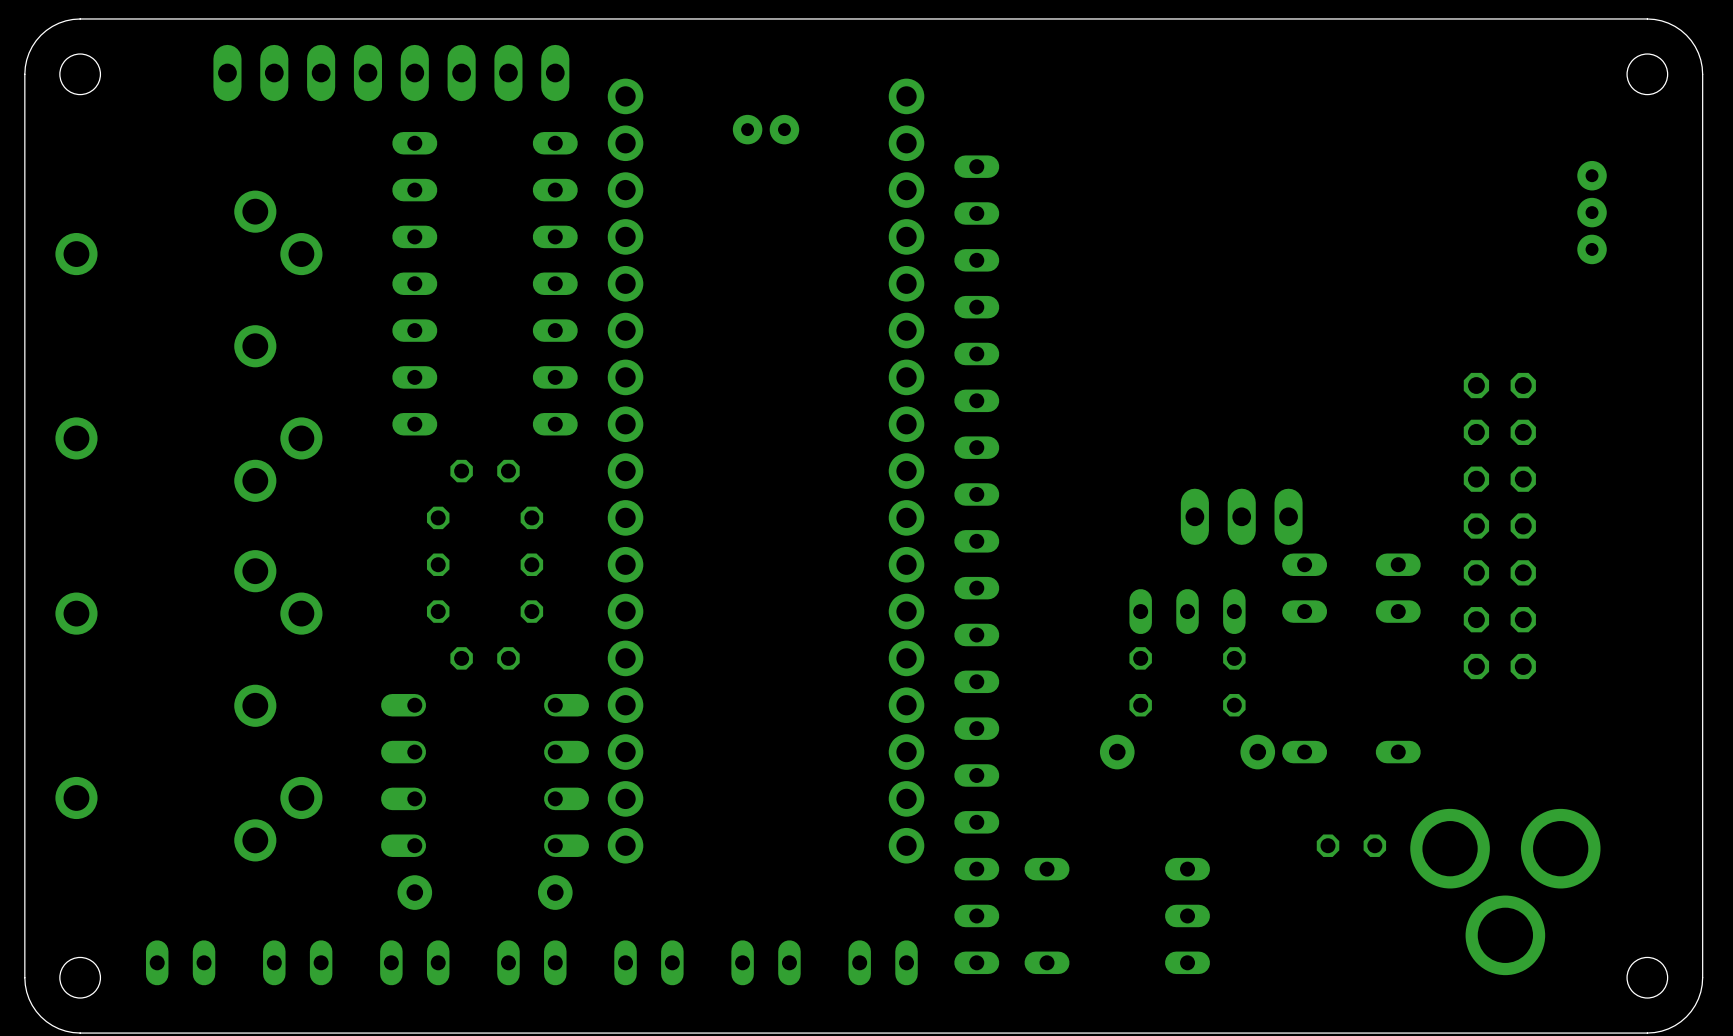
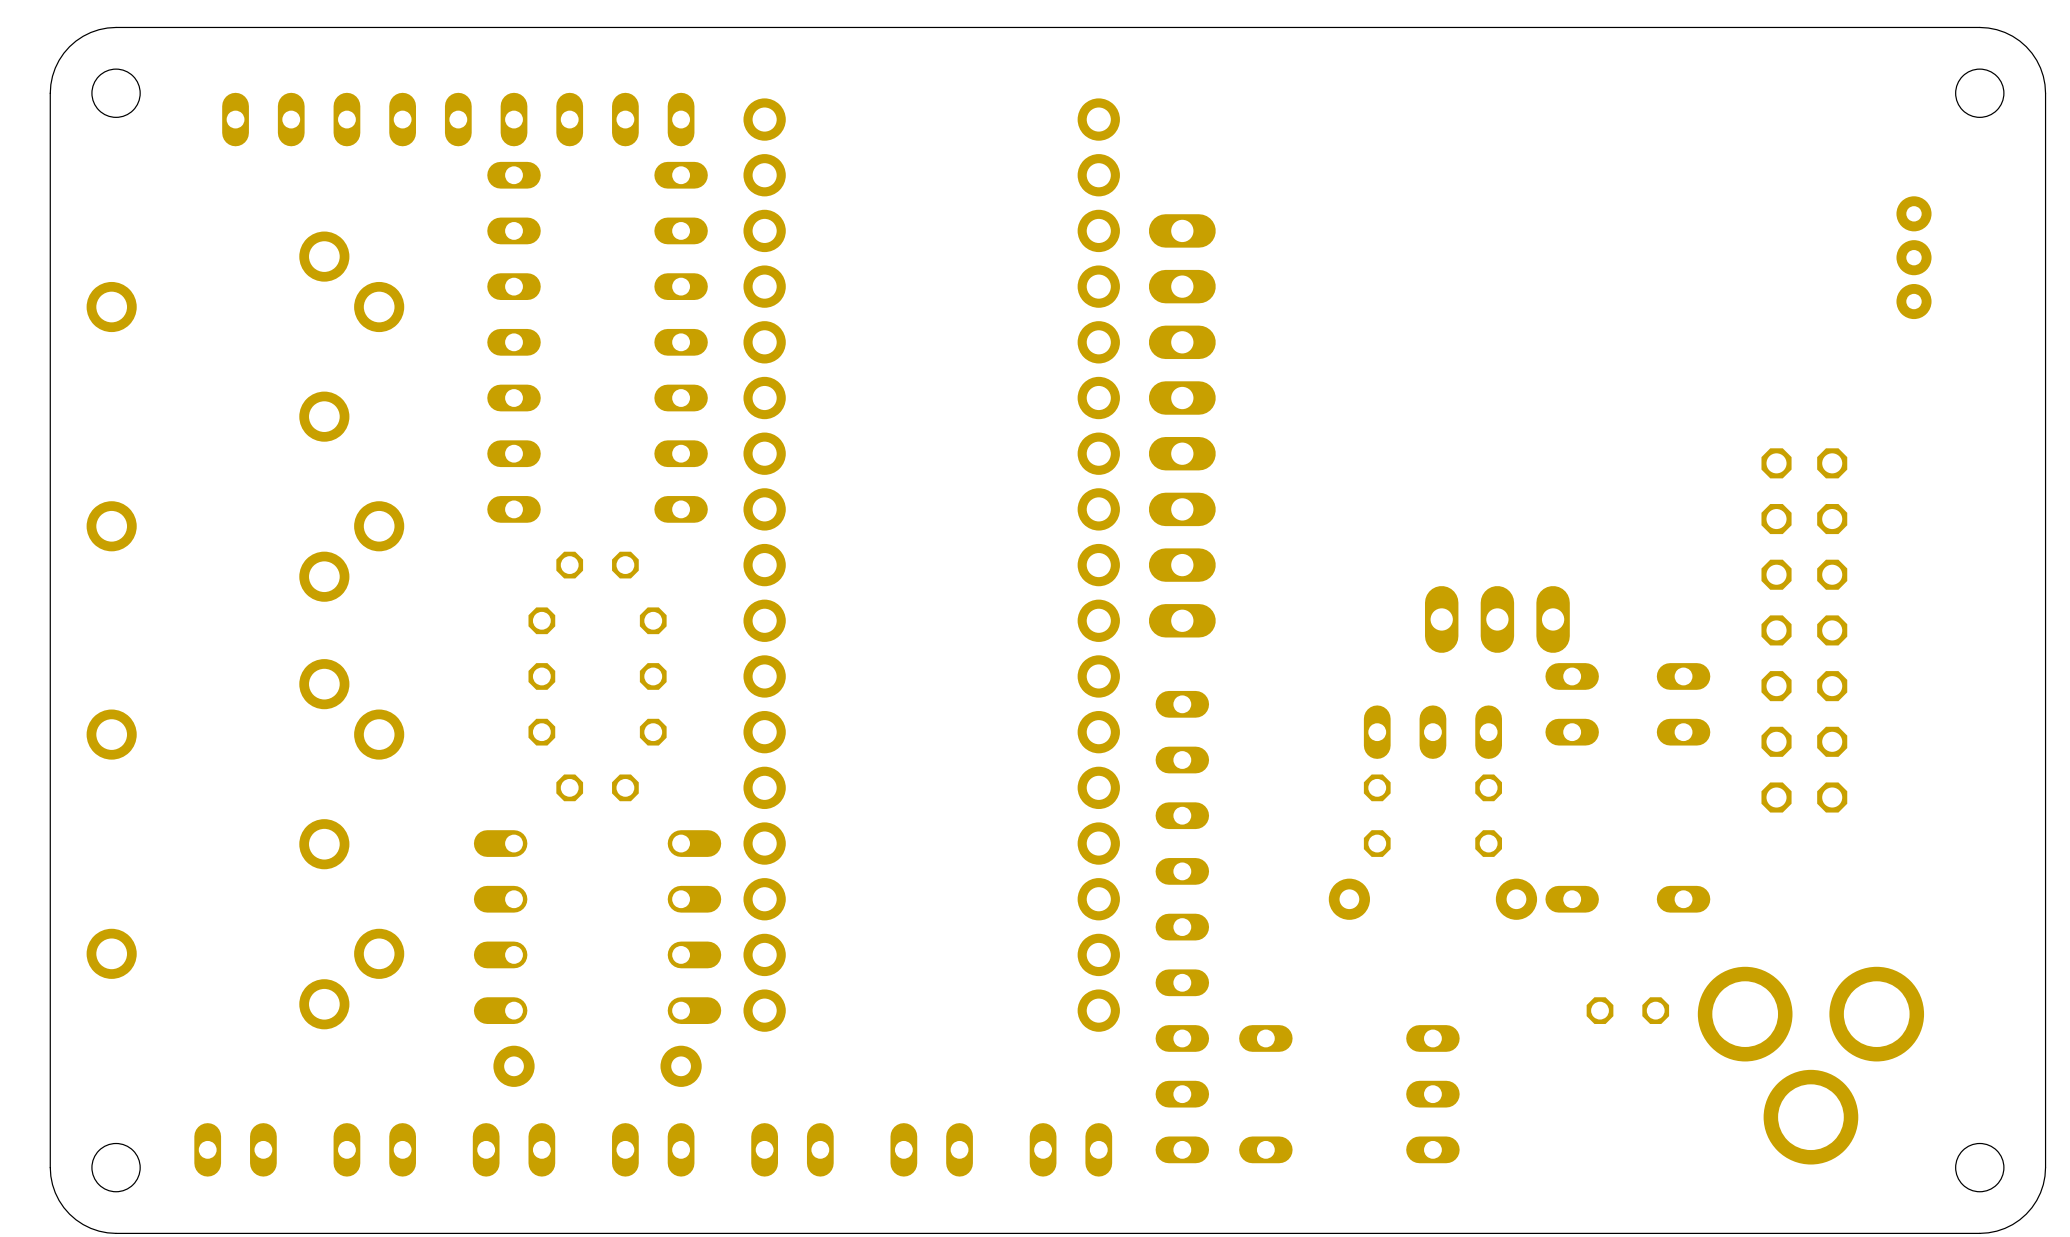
part: (391, 73) -> none
part: none -> (458, 119)
part: (766, 129) -> none
part footprint: [954, 155, 1000, 553] -> [1148, 214, 1216, 638]

